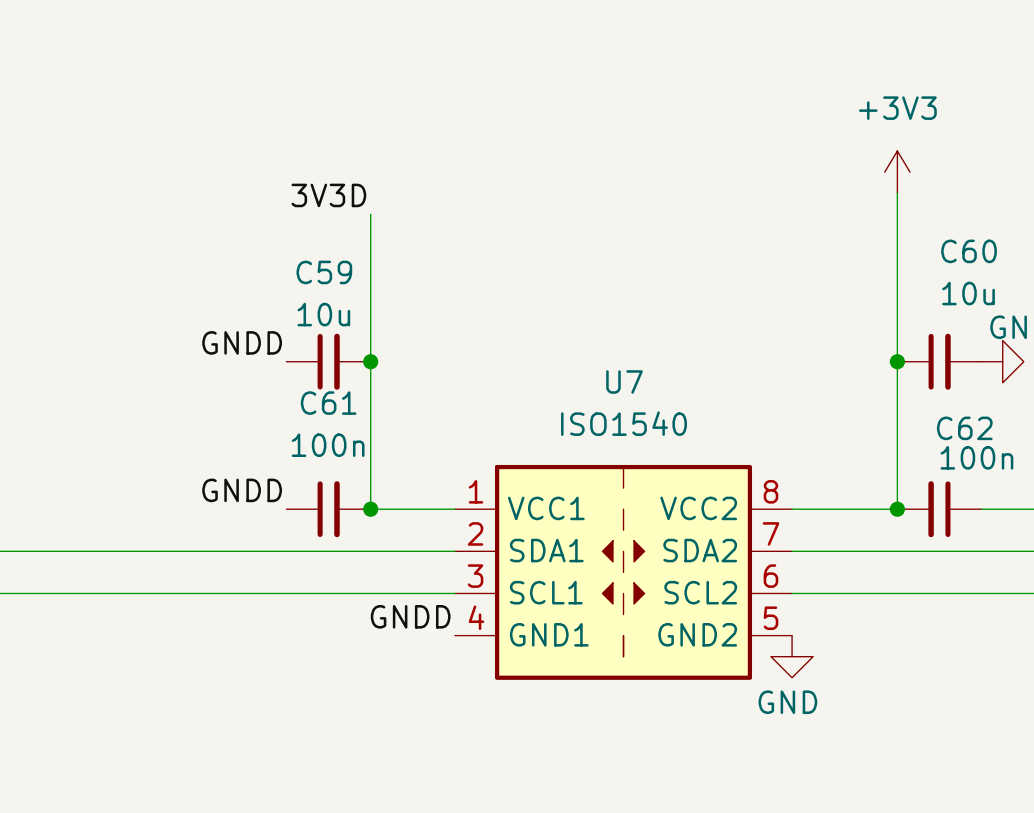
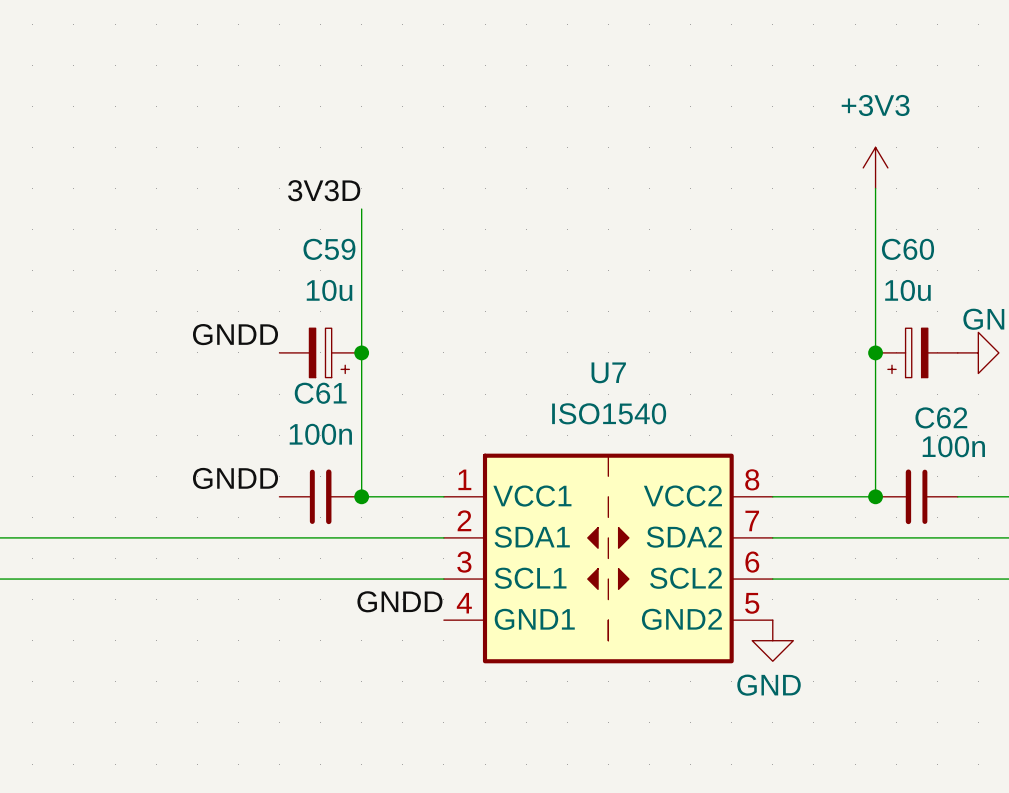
C60 name position: C60 (969, 251) -> C60 (908, 249)
C60 value position: 10u (968, 293) -> 10u (907, 290)
C59 symbol: [286, 333, 371, 390] -> [279, 328, 362, 378]
C60 symbol: [897, 333, 982, 390] -> [875, 328, 958, 378]

